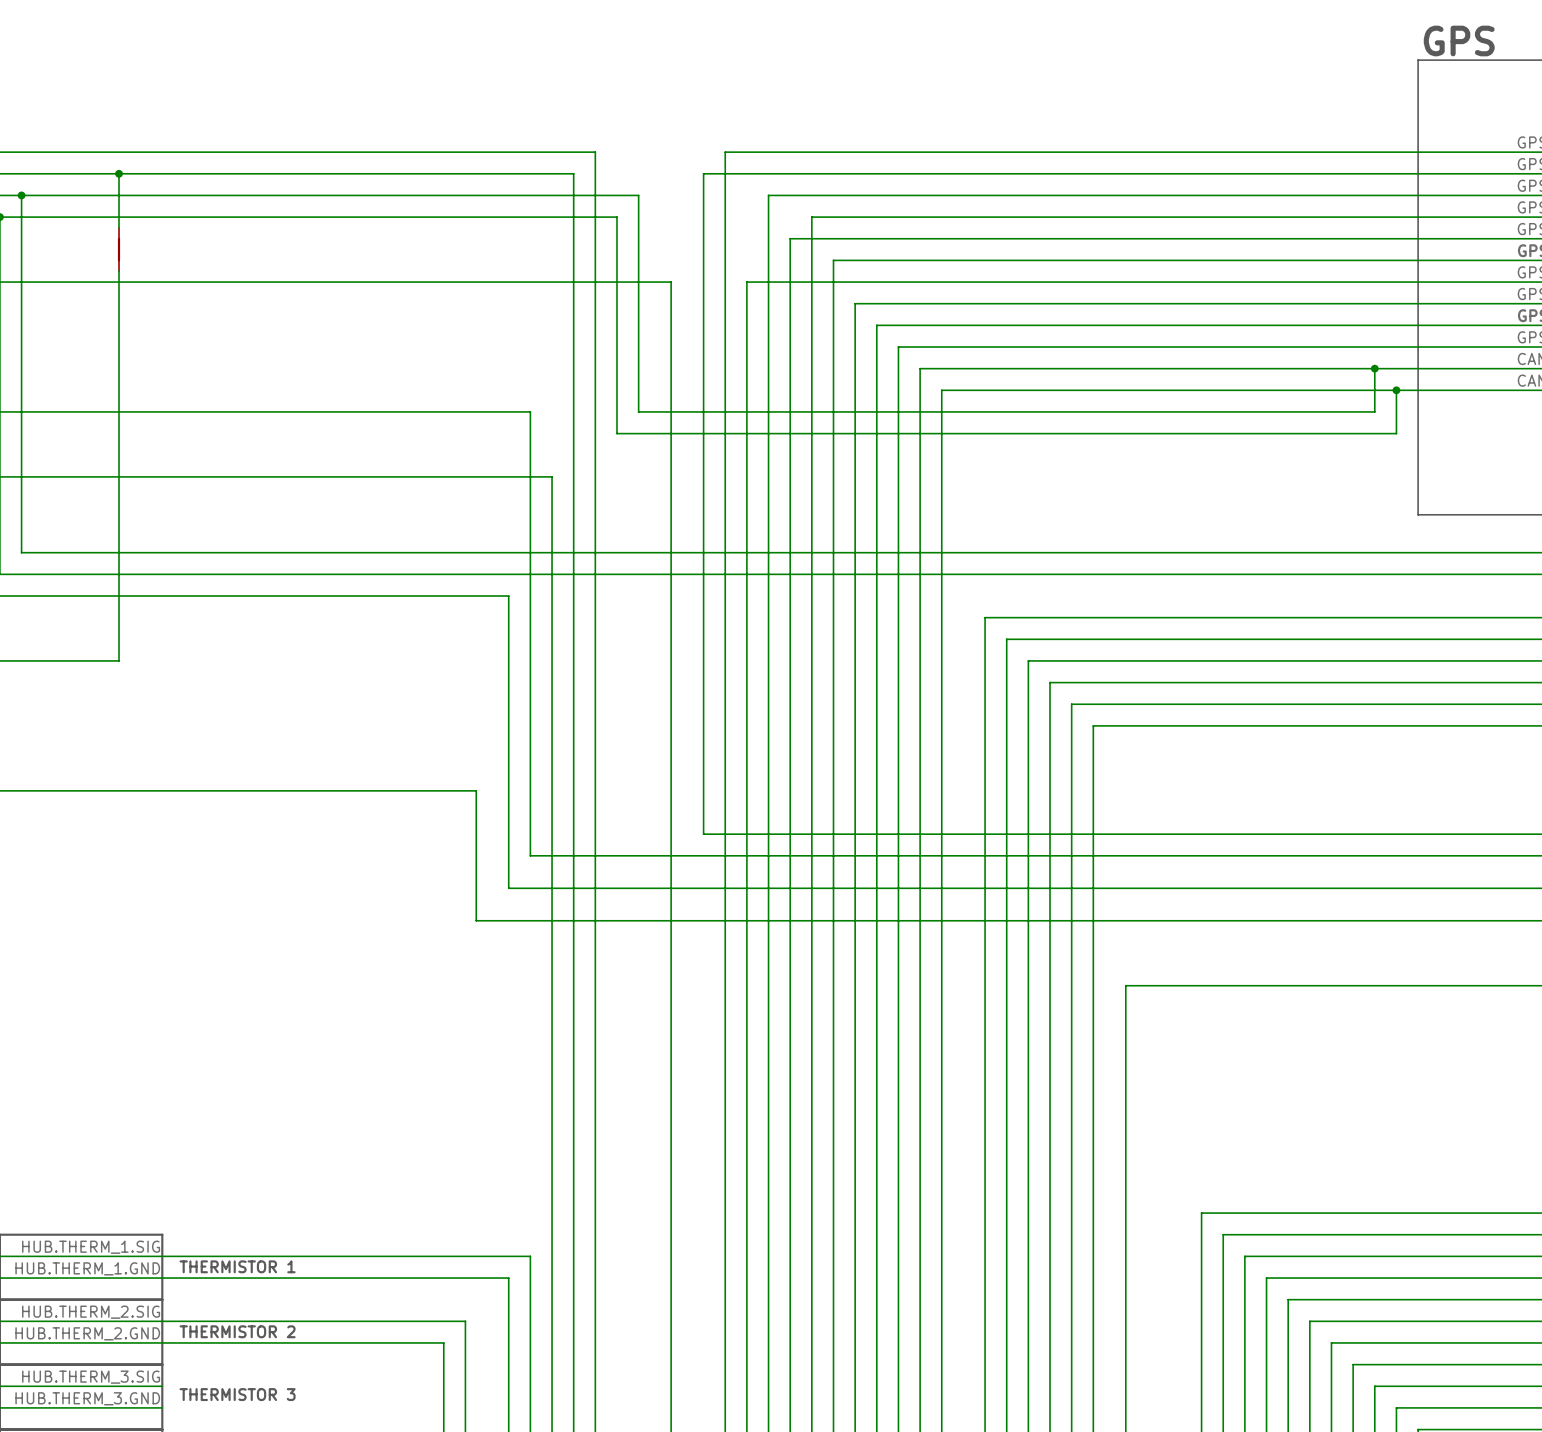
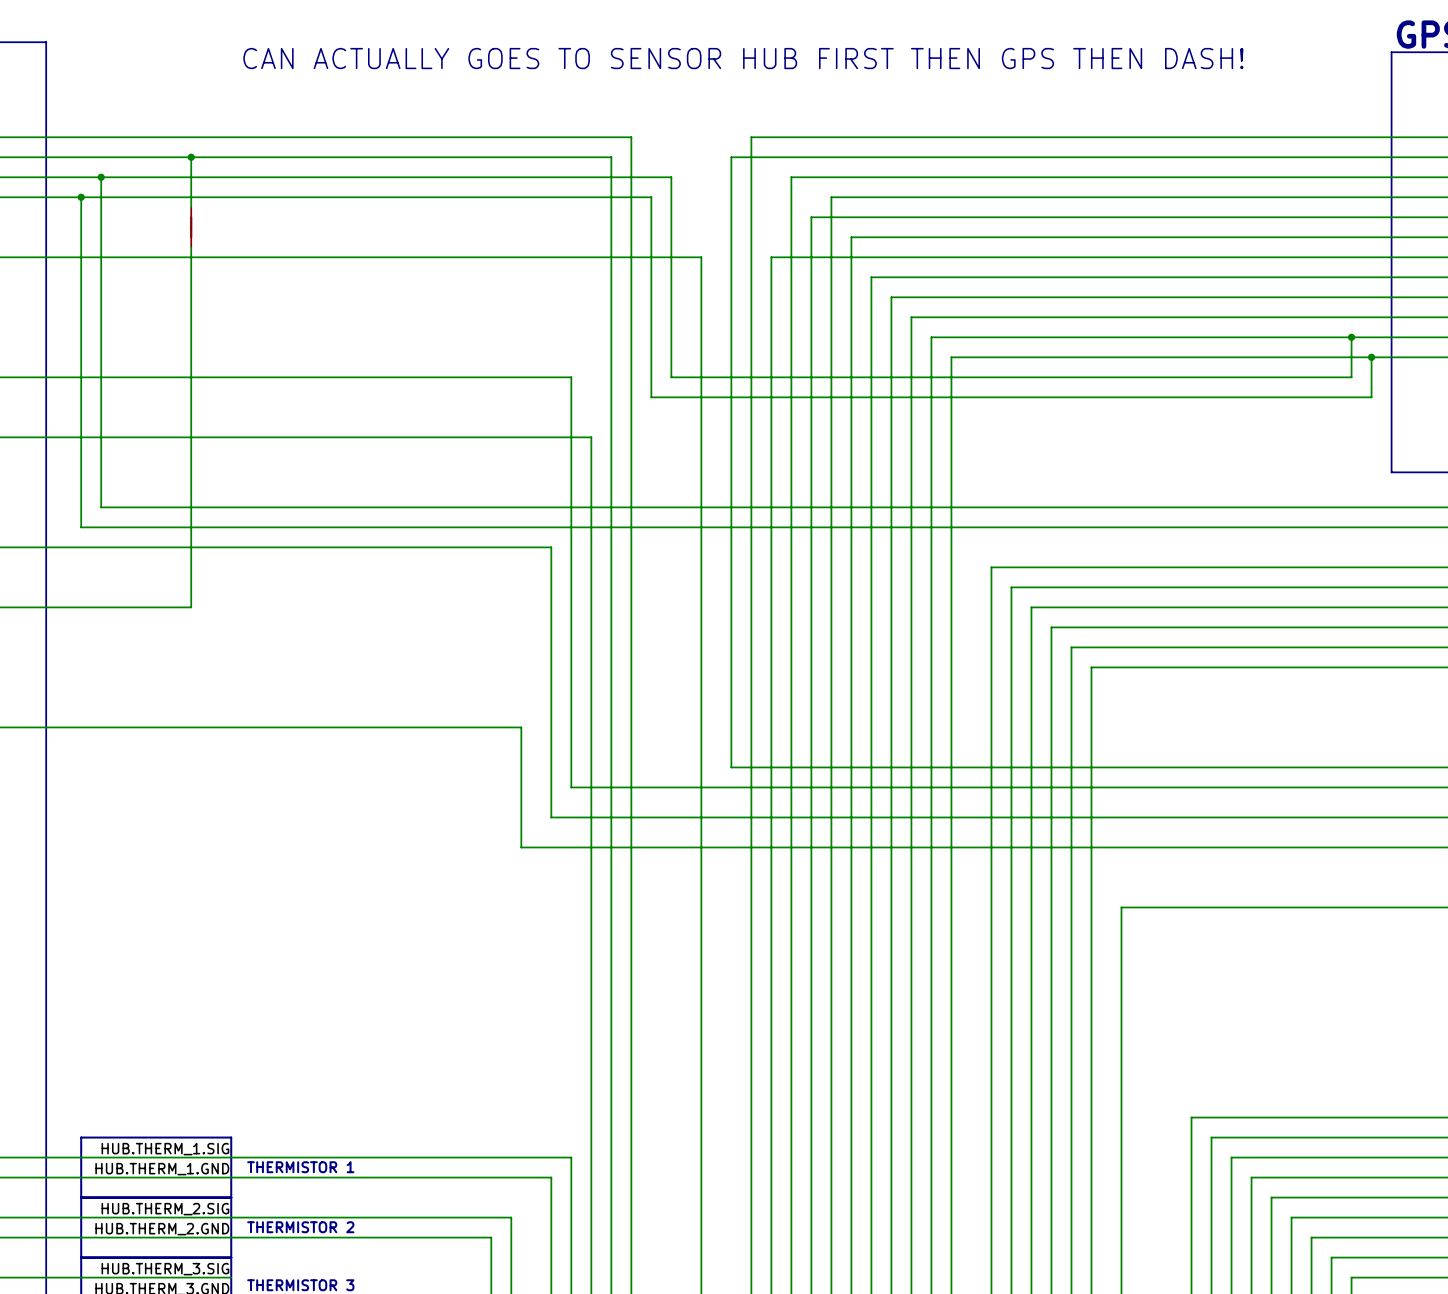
text: none -> CAN ACTUALLY GOES TO SENSOR HUB FIRST THEN GPS THEN DASH! (743, 58)

